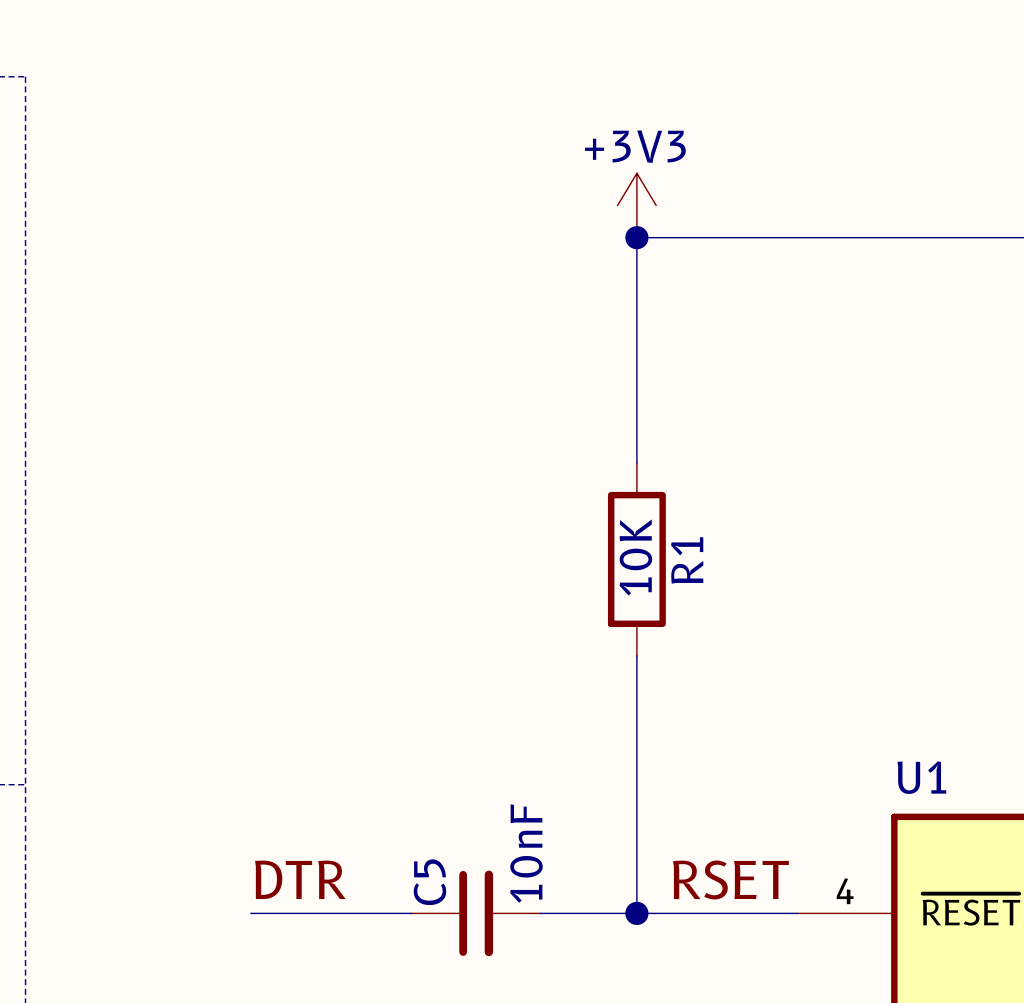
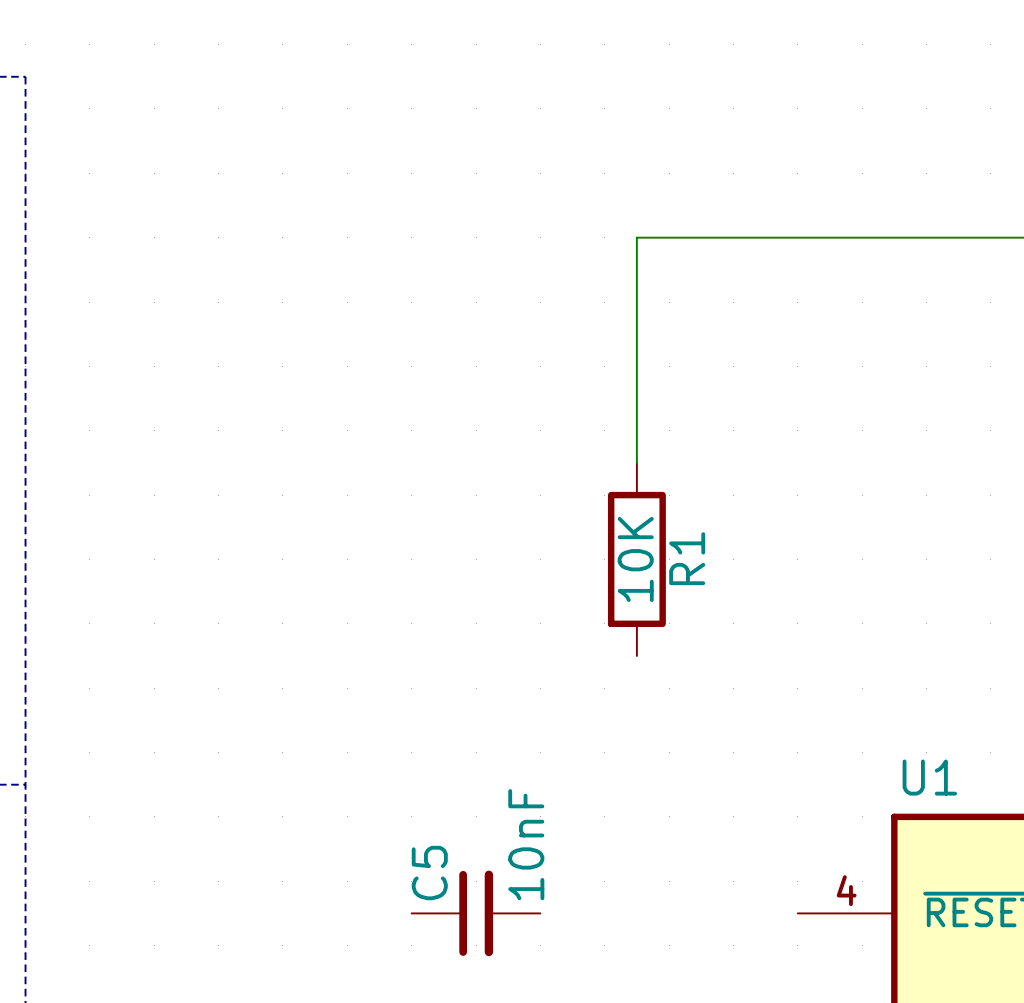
power symbol: +3V3 (636, 205) -> none
junction: (636, 237) -> none
wire: (636, 655) (636, 913) -> none
label: DTR (300, 879) -> none
label: RSET (730, 879) -> none
wire: (250, 913) (411, 913) -> none
wire: (540, 913) (797, 913) -> none
junction: (636, 913) -> none

